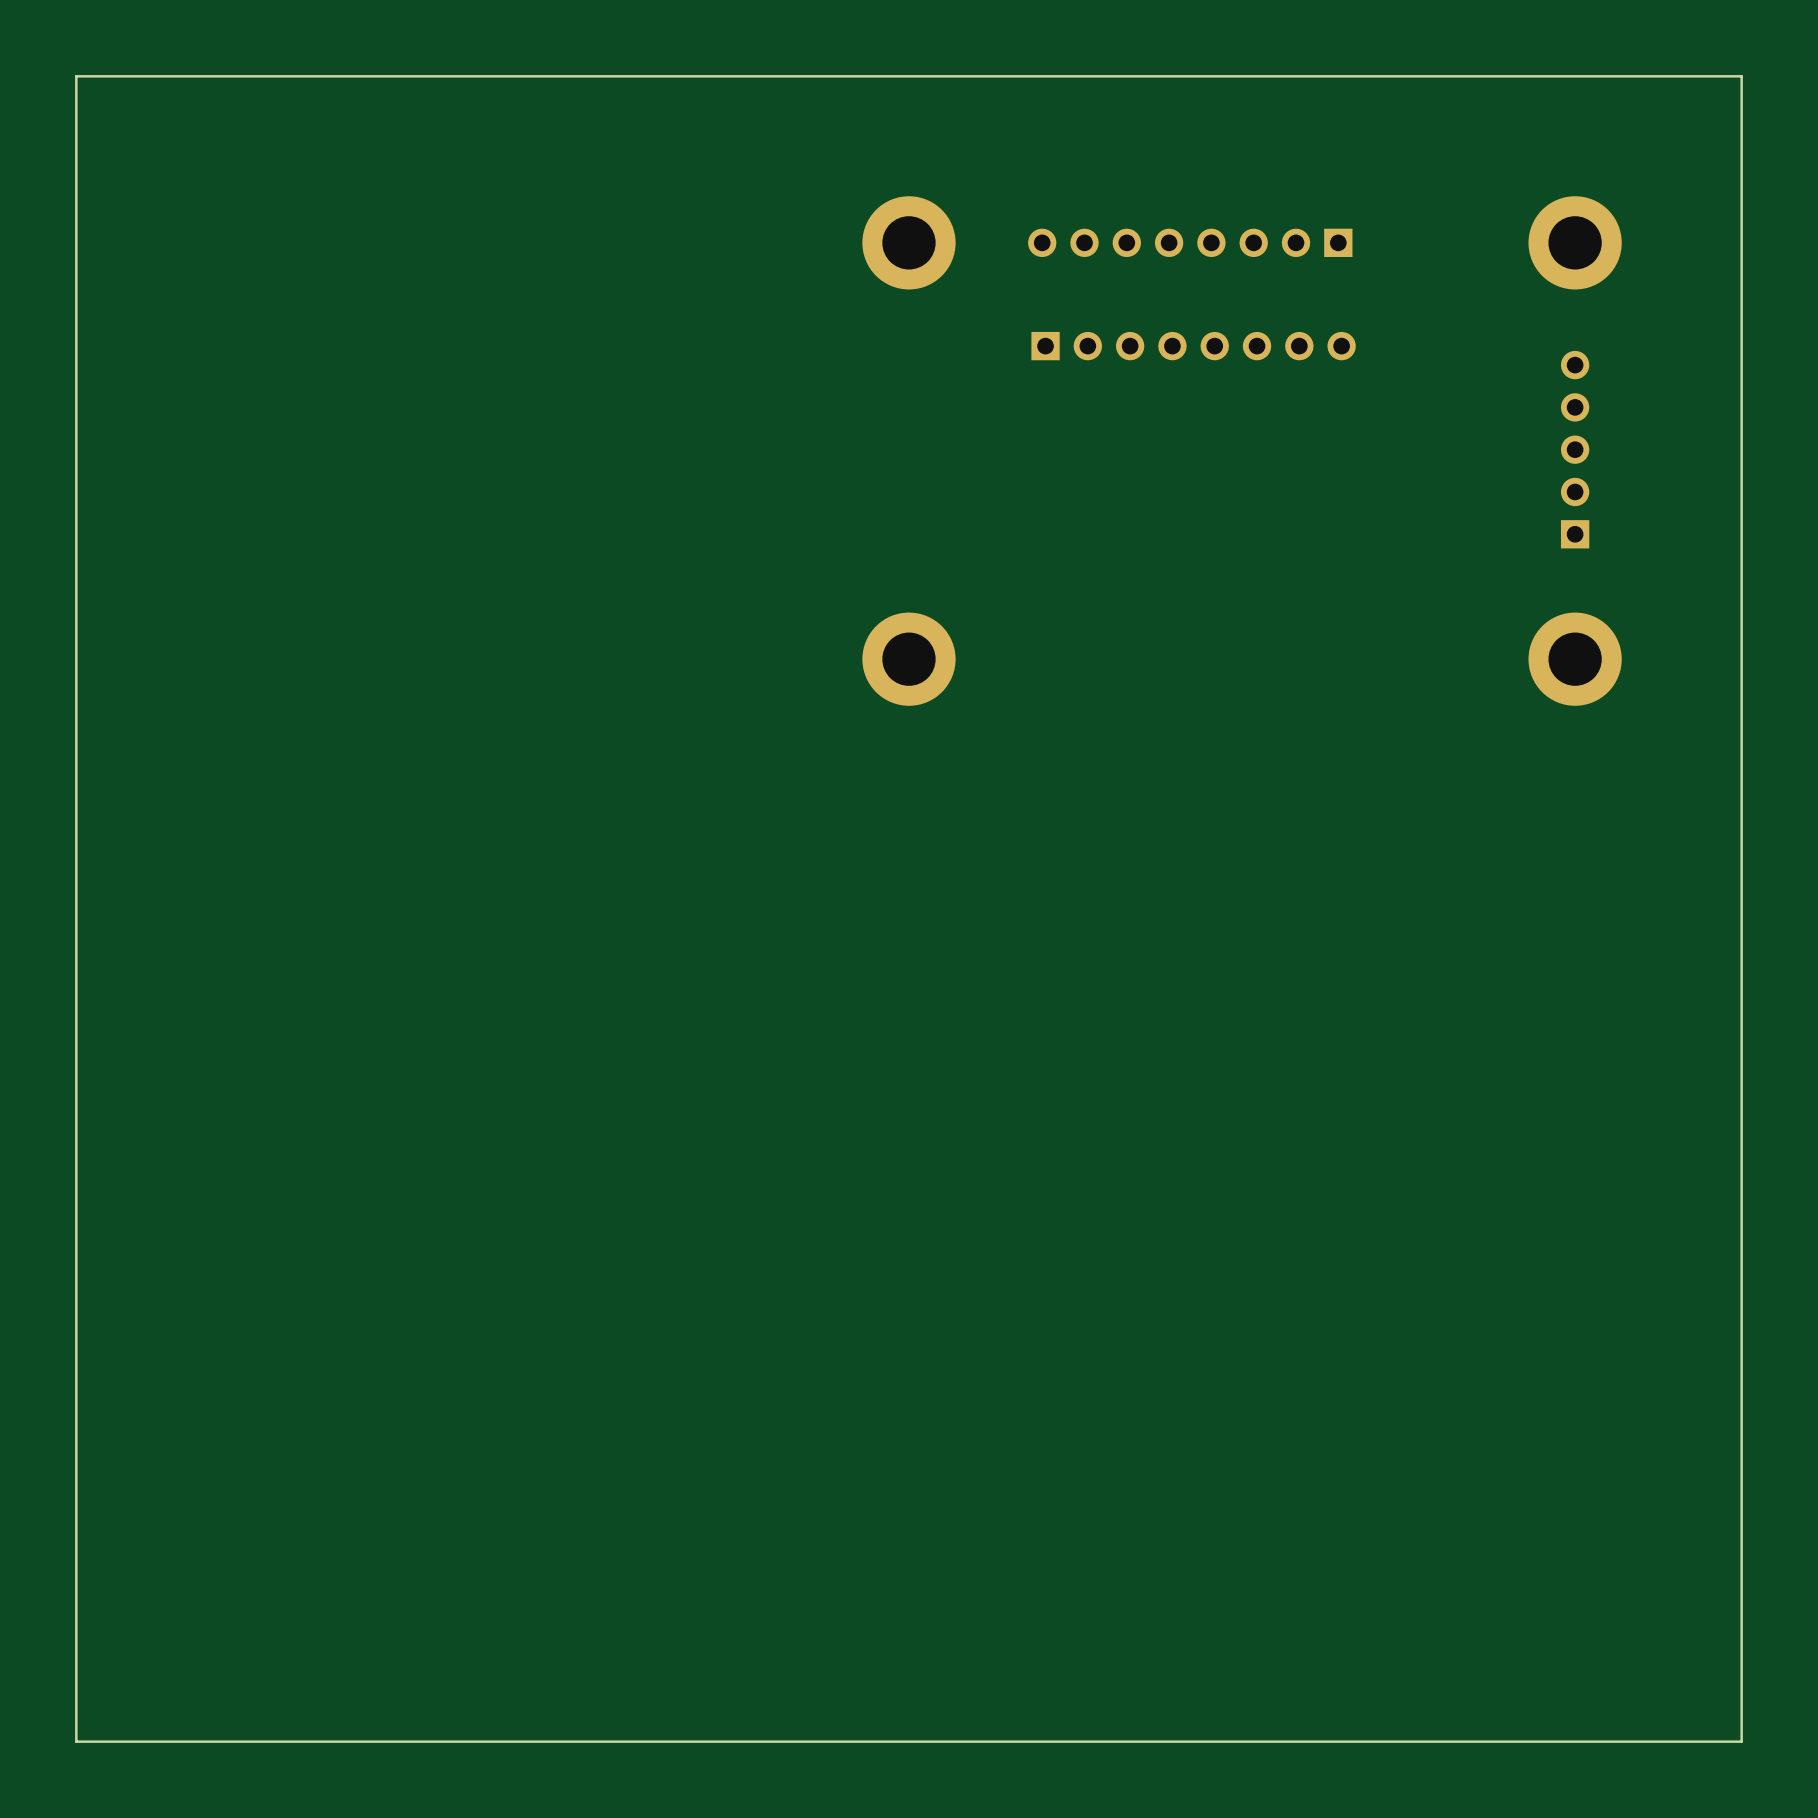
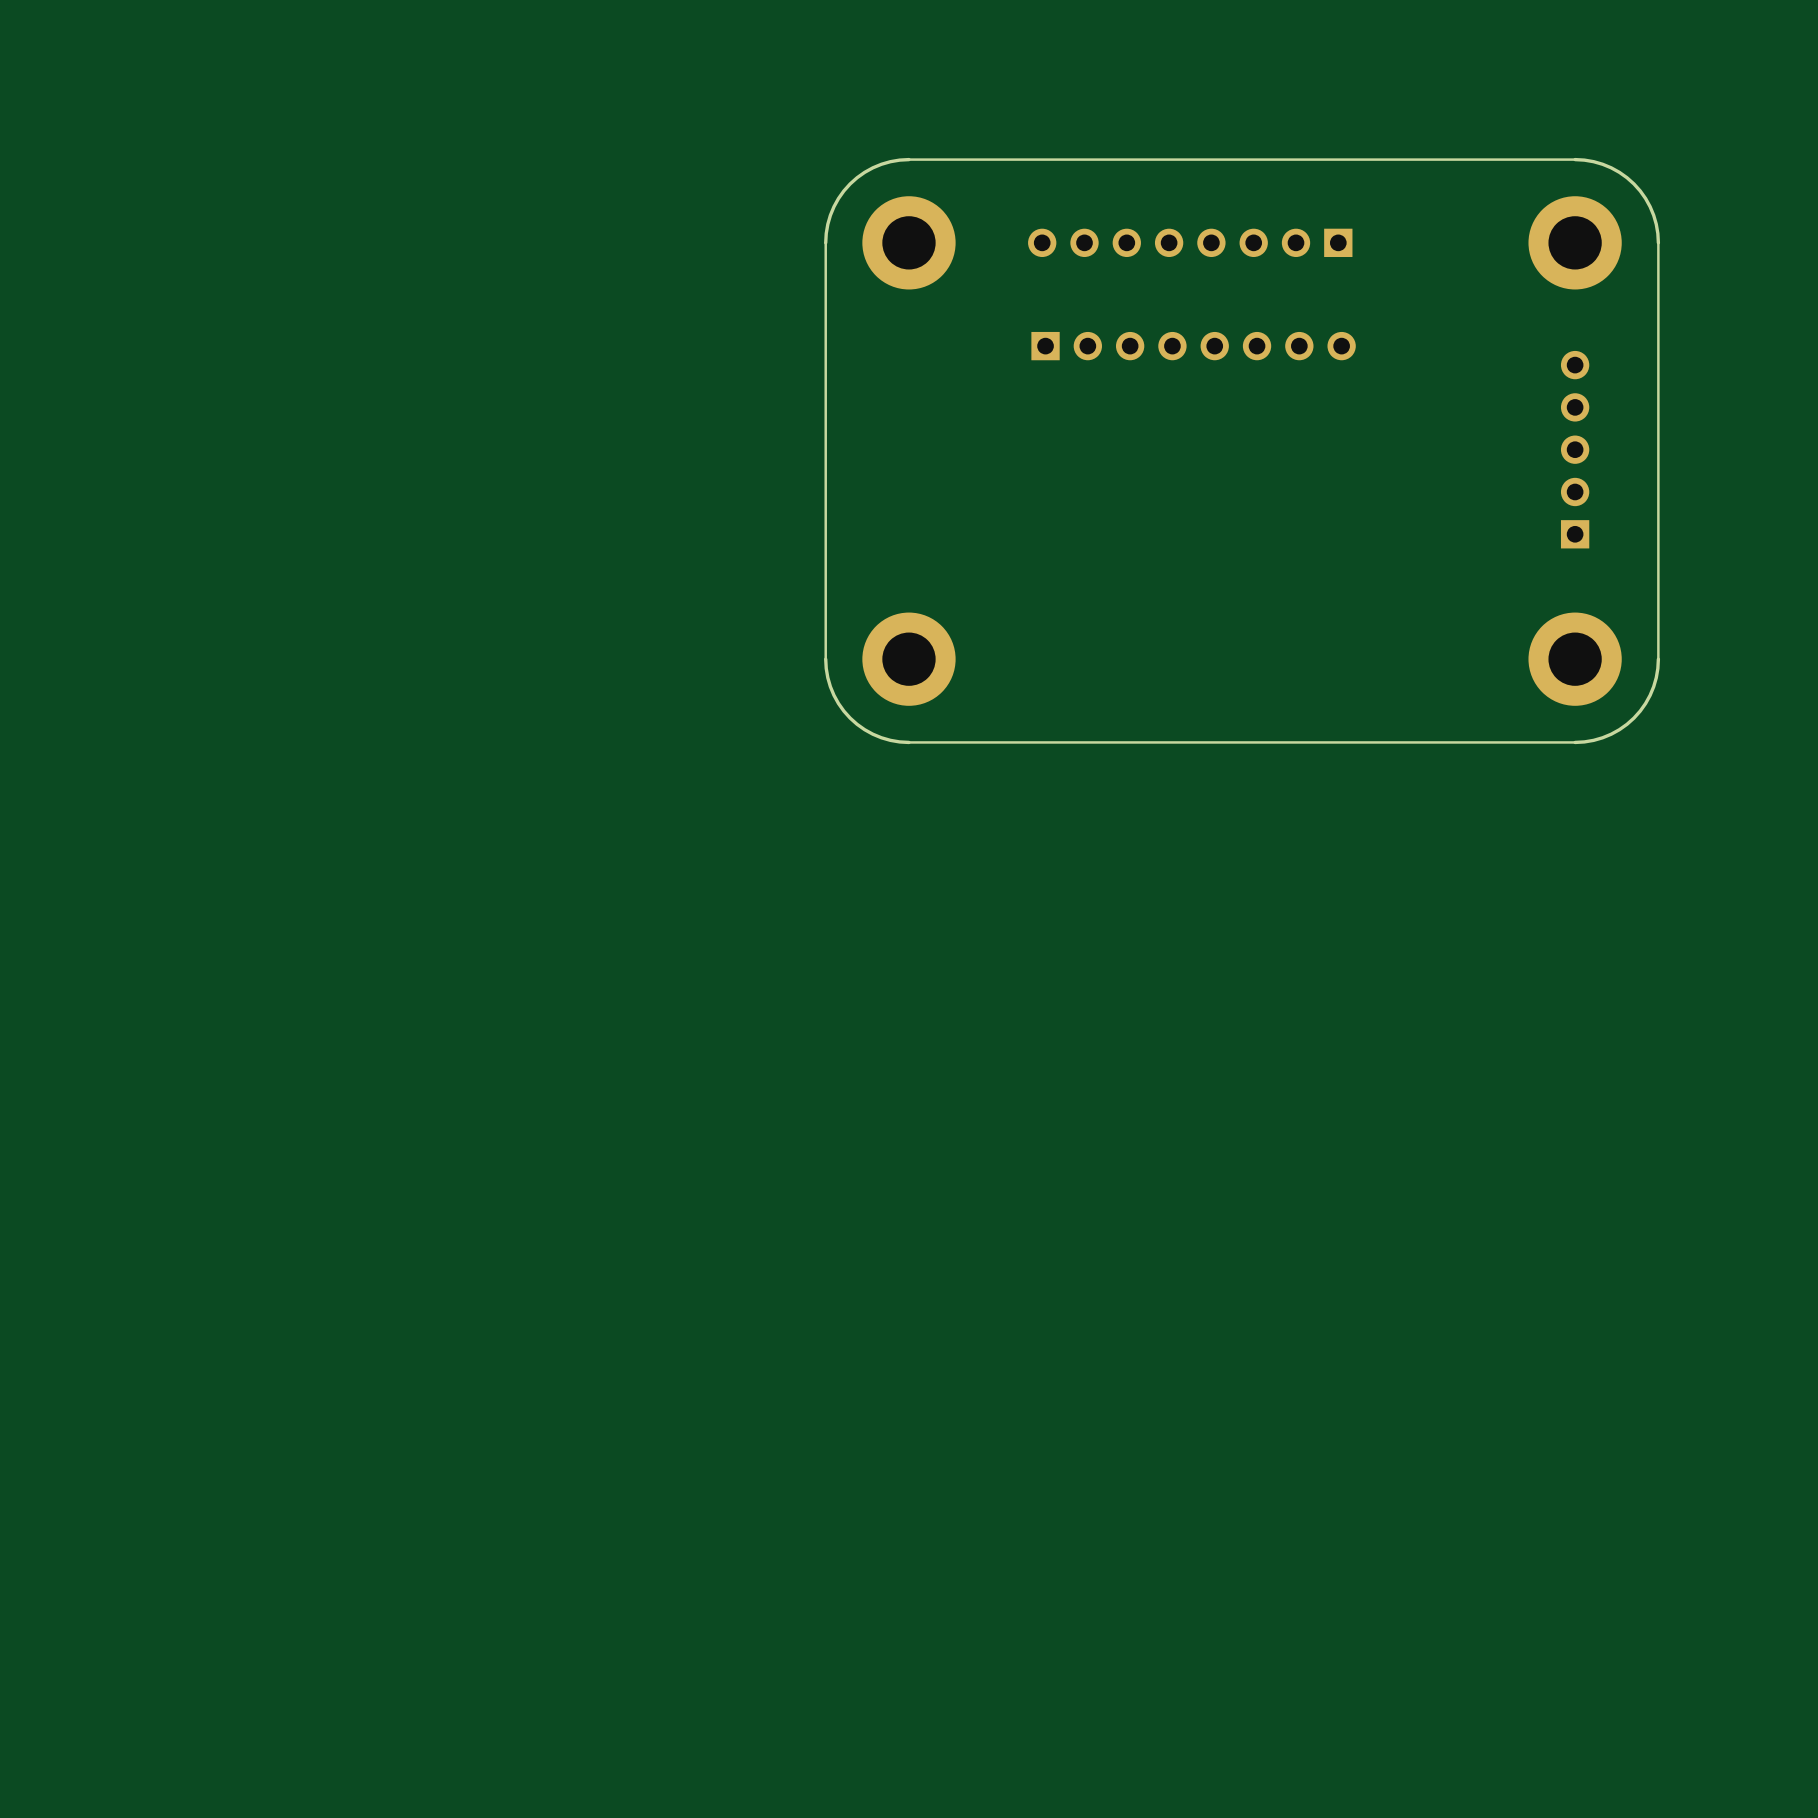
board edge: (1741, 76) (76, 76) (76, 1741) (1741, 1741) (1741, 76) -> none
board edge: none -> (1575, 159) (908, 159) (881, 164) (857, 177) (843, 190) (833, 206) (827, 224) (825, 242) (825, 659) (830, 686) (843, 711) (857, 724) (872, 734) (890, 740) (908, 742) (1575, 742) (1602, 737) (1627, 724) (1640, 711) (1650, 695) (1657, 668) (1657, 233) (1650, 206) (1633, 183) (1619, 172) (1602, 164) (1575, 159)

